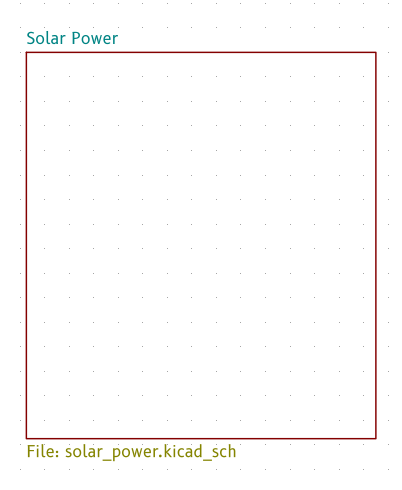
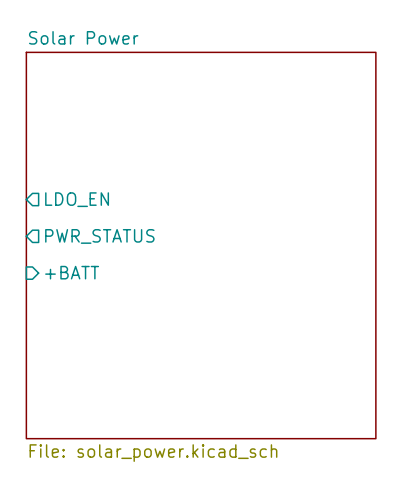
sheet pin: none -> LDO_EN (77, 199)
sheet pin: none -> PWR_STATUS (99, 236)
sheet pin: none -> +BATT (72, 272)

